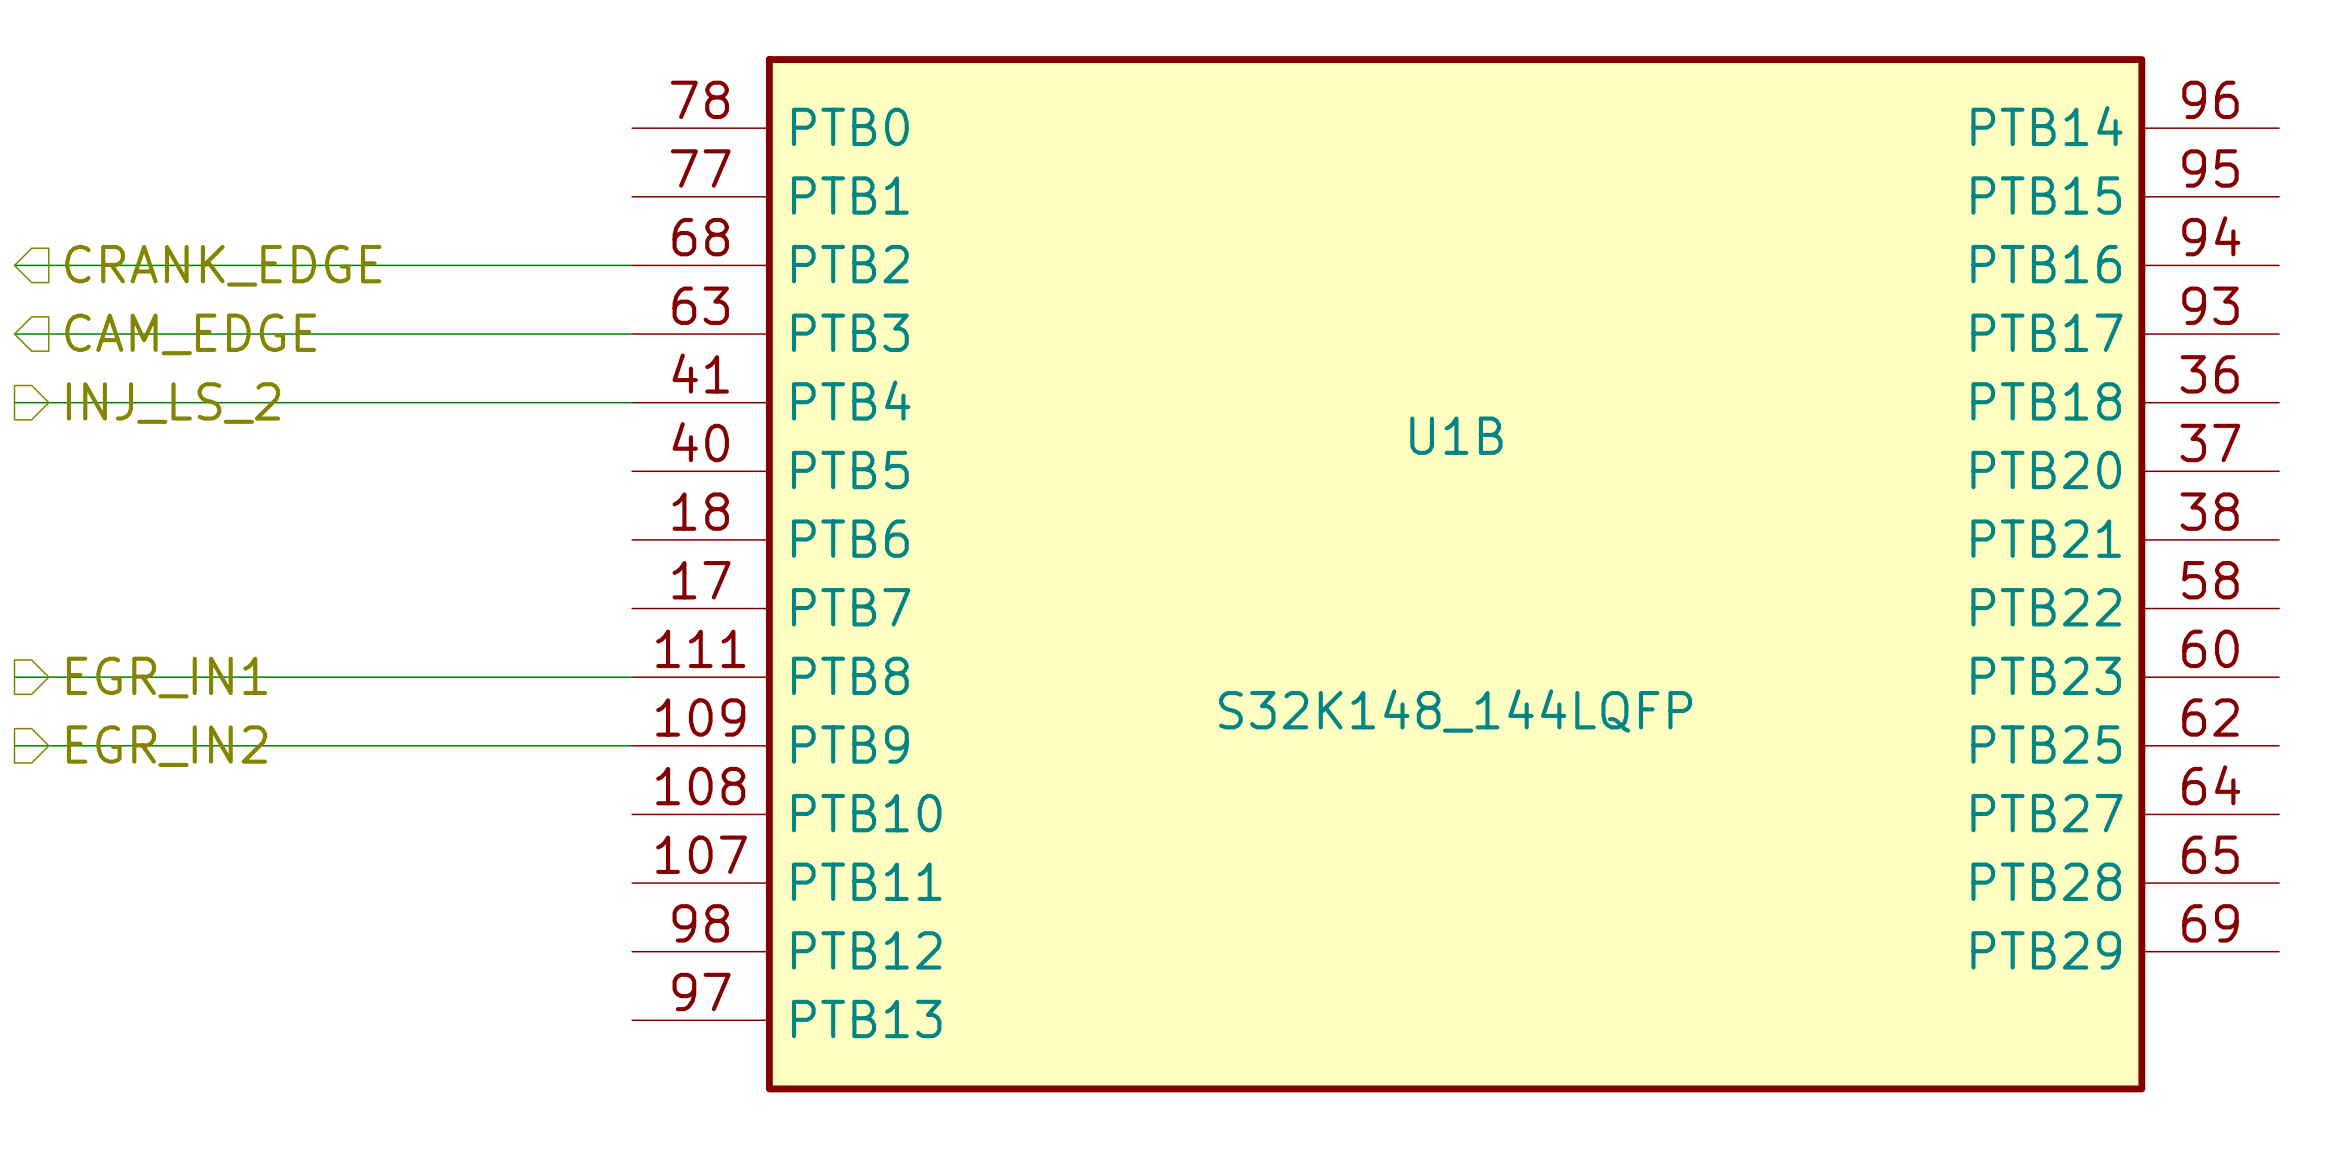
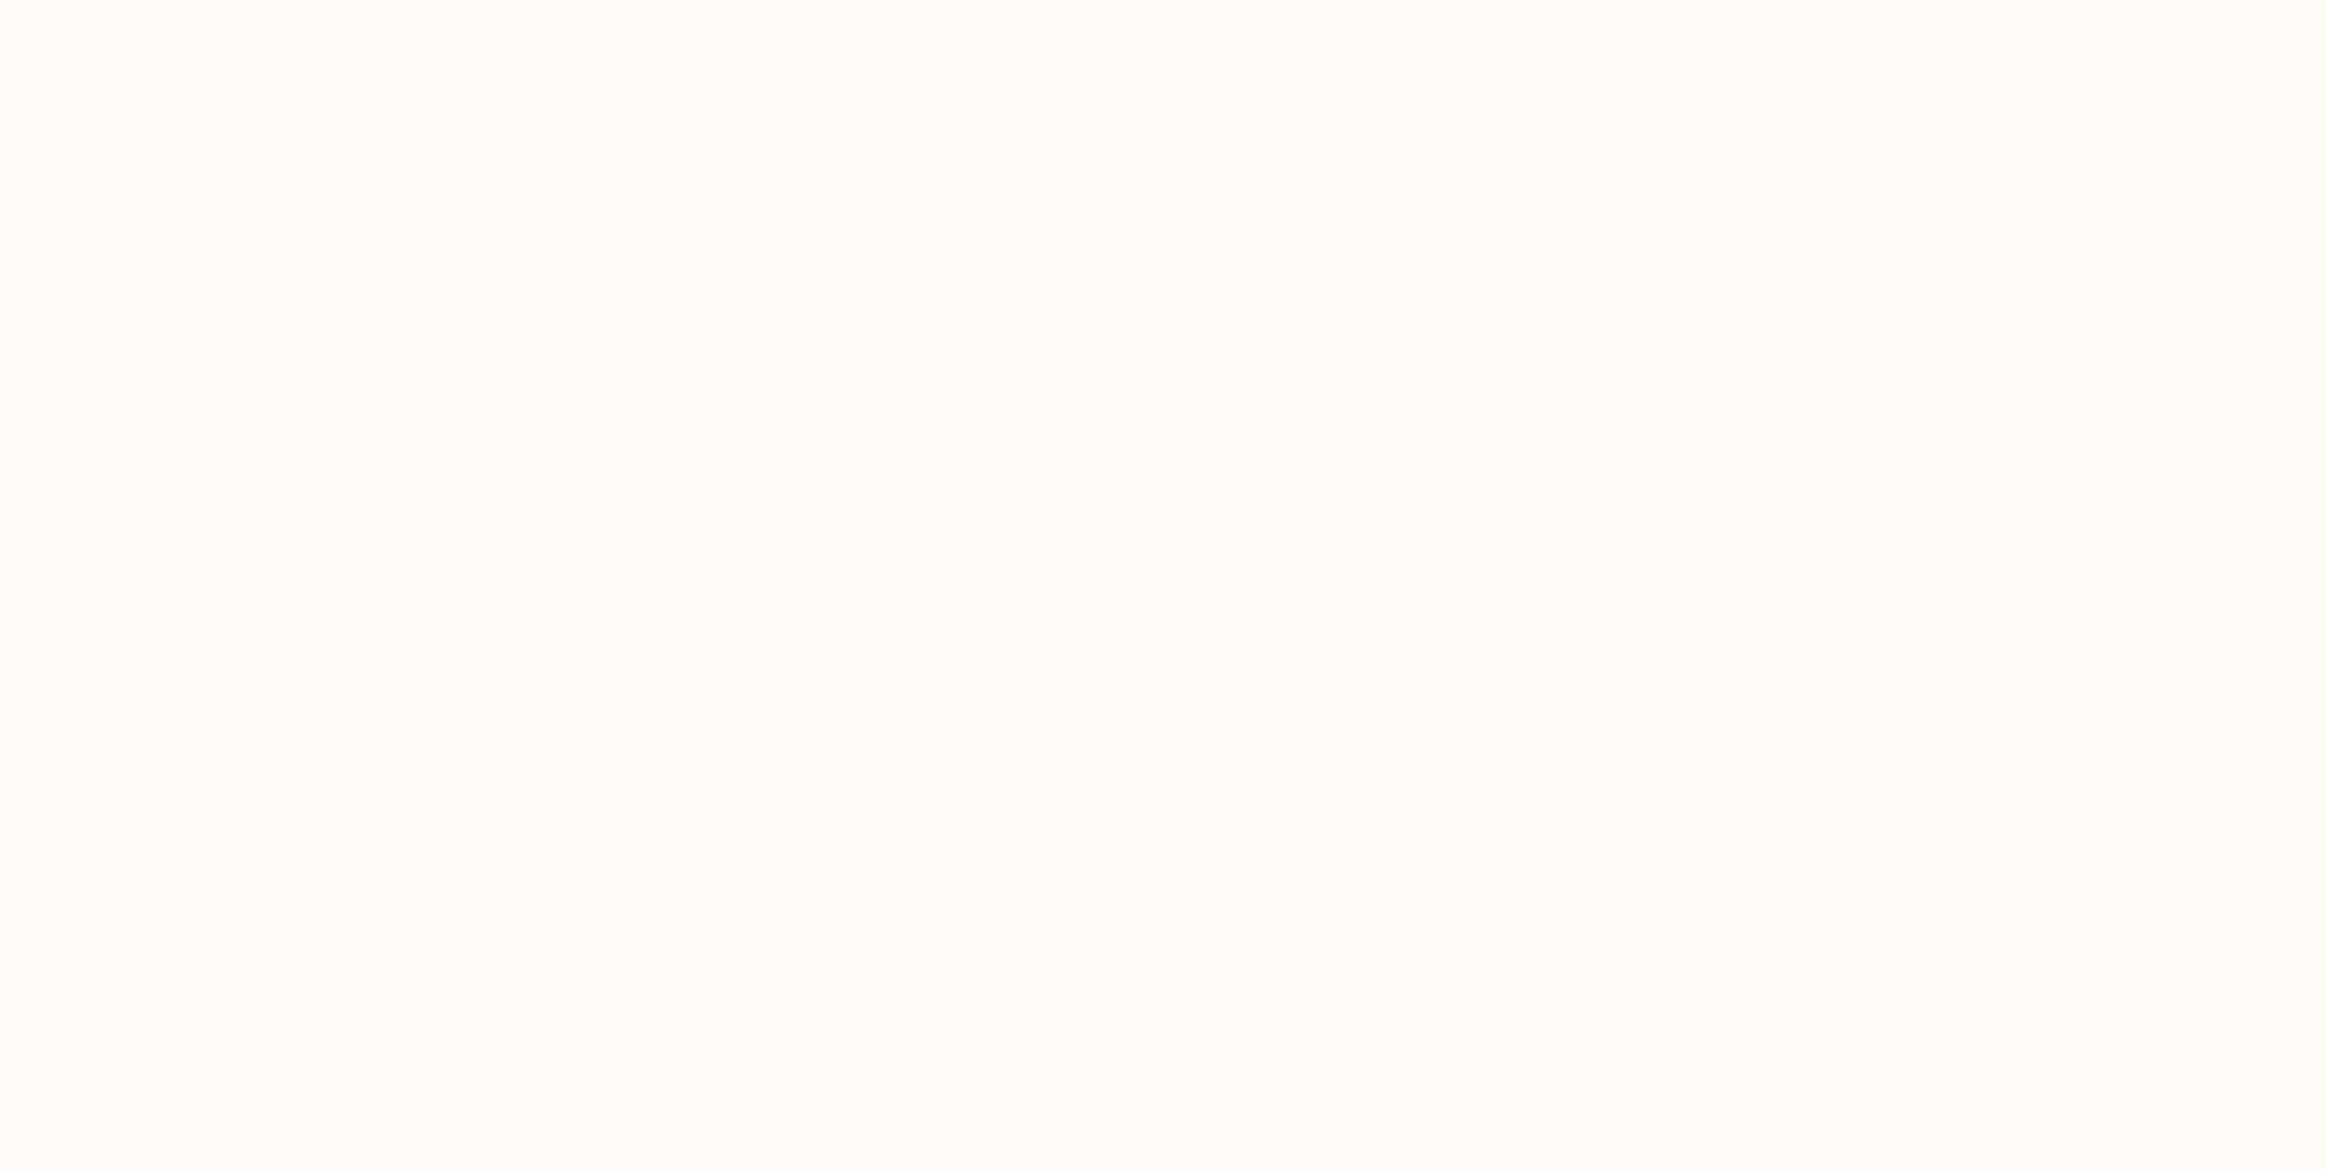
wire: (14, 265) (632, 265) -> none
hierarchical label: CRANK_EDGE (223, 265) -> none
wire: (14, 334) (632, 334) -> none
hierarchical label: CAM_EDGE (190, 334) -> none
wire: (14, 402) (632, 402) -> none
hierarchical label: INJ_LS_2 (173, 403) -> none
U1B: S32K148_144LQFP (1455, 574) -> none
wire: (14, 677) (632, 677) -> none
hierarchical label: EGR_IN1 (166, 677) -> none
wire: (14, 745) (632, 745) -> none
hierarchical label: EGR_IN2 (166, 746) -> none

